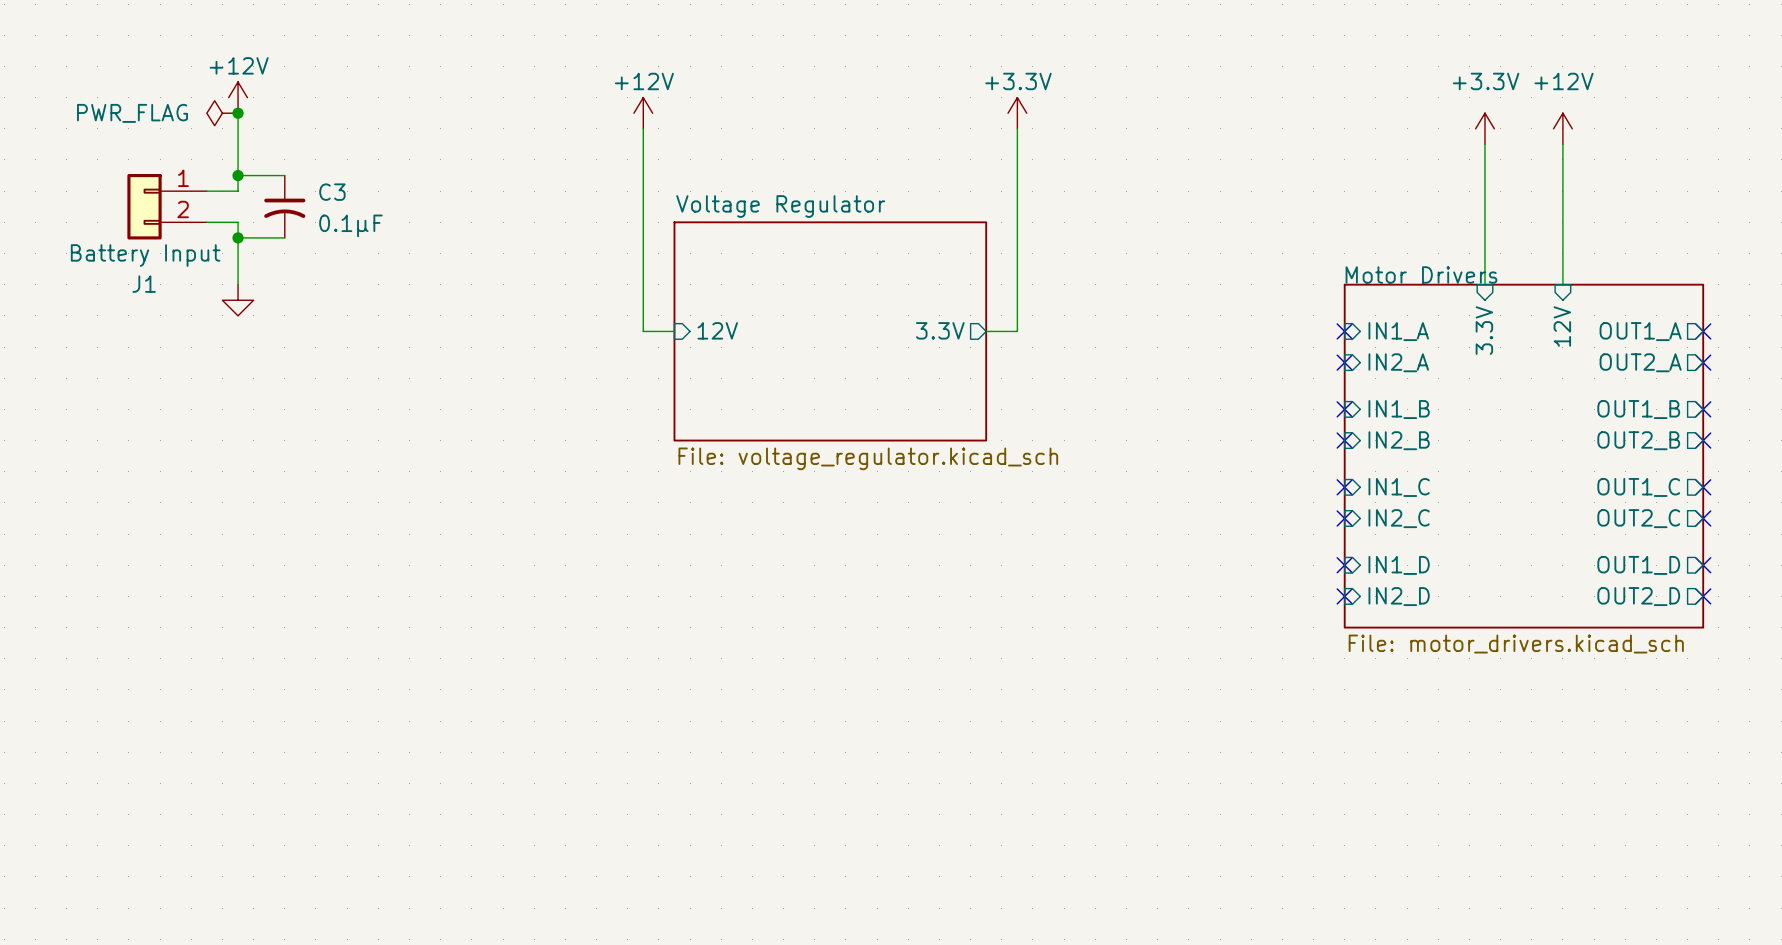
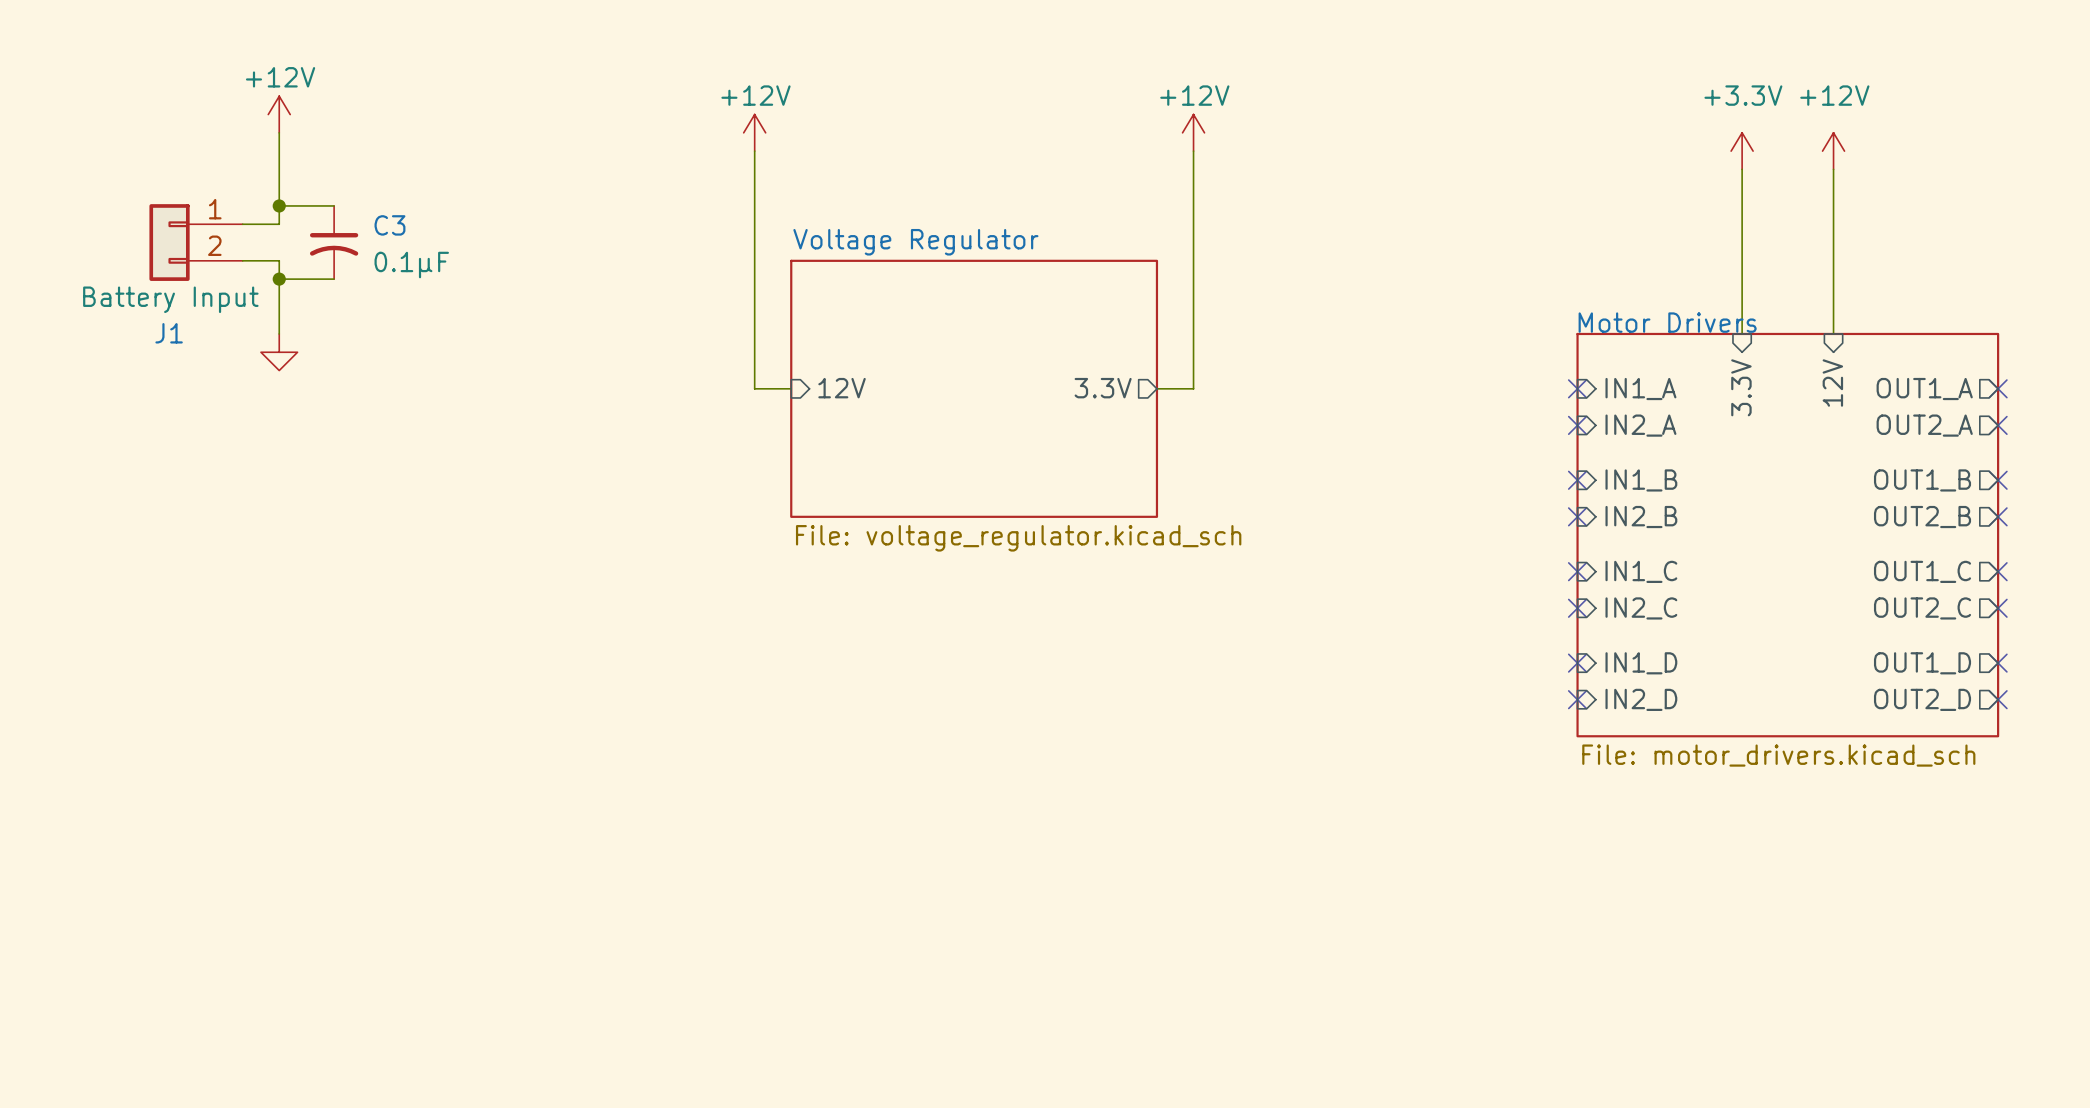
power symbol: PWR_FLAG (222, 113) -> none
junction: (238, 113) -> none
power symbol: +3.3V (1017, 113) -> +12V (1193, 132)

